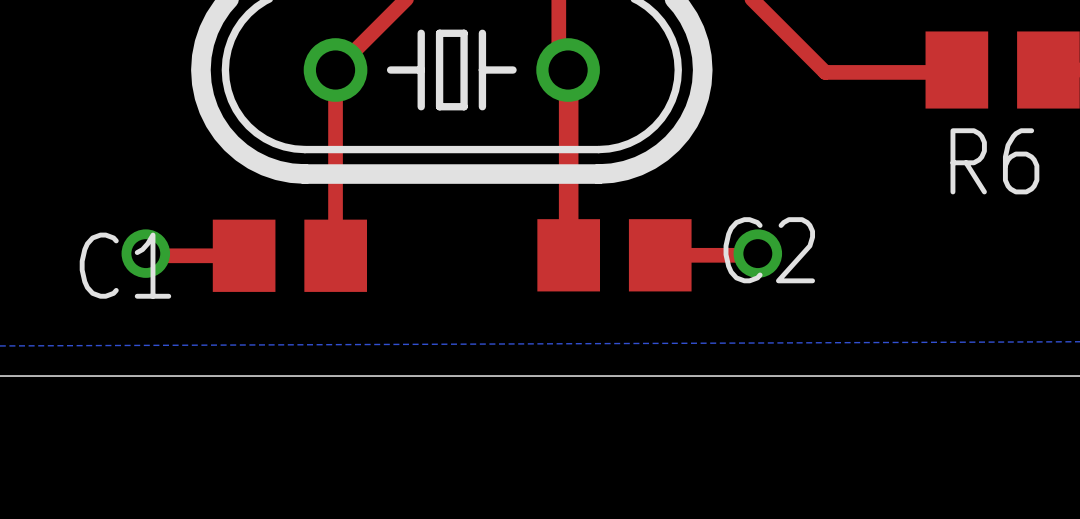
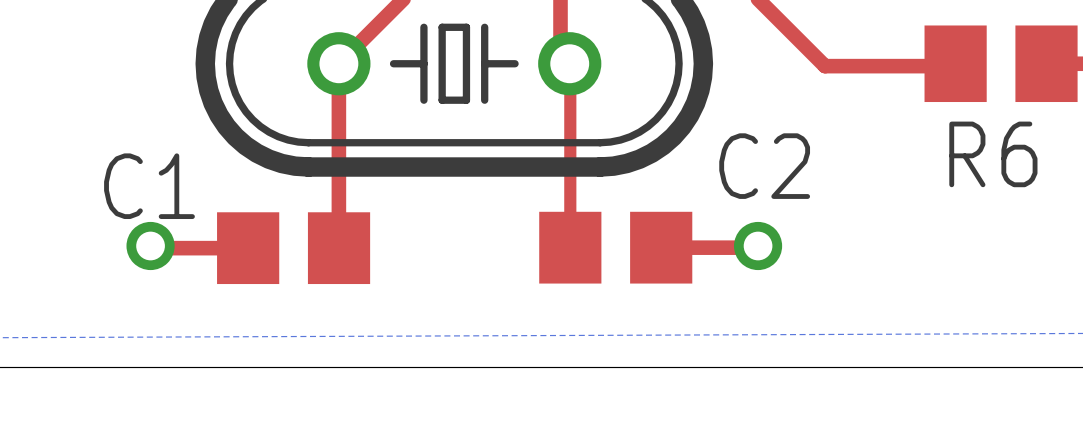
top track width: thick (568, 70) (568, 255) -> thin (570, 63) (570, 247)
C2 name position: C2 (769, 250) -> C2 (764, 166)
C1 name position: C1 (125, 265) -> C1 (149, 186)

